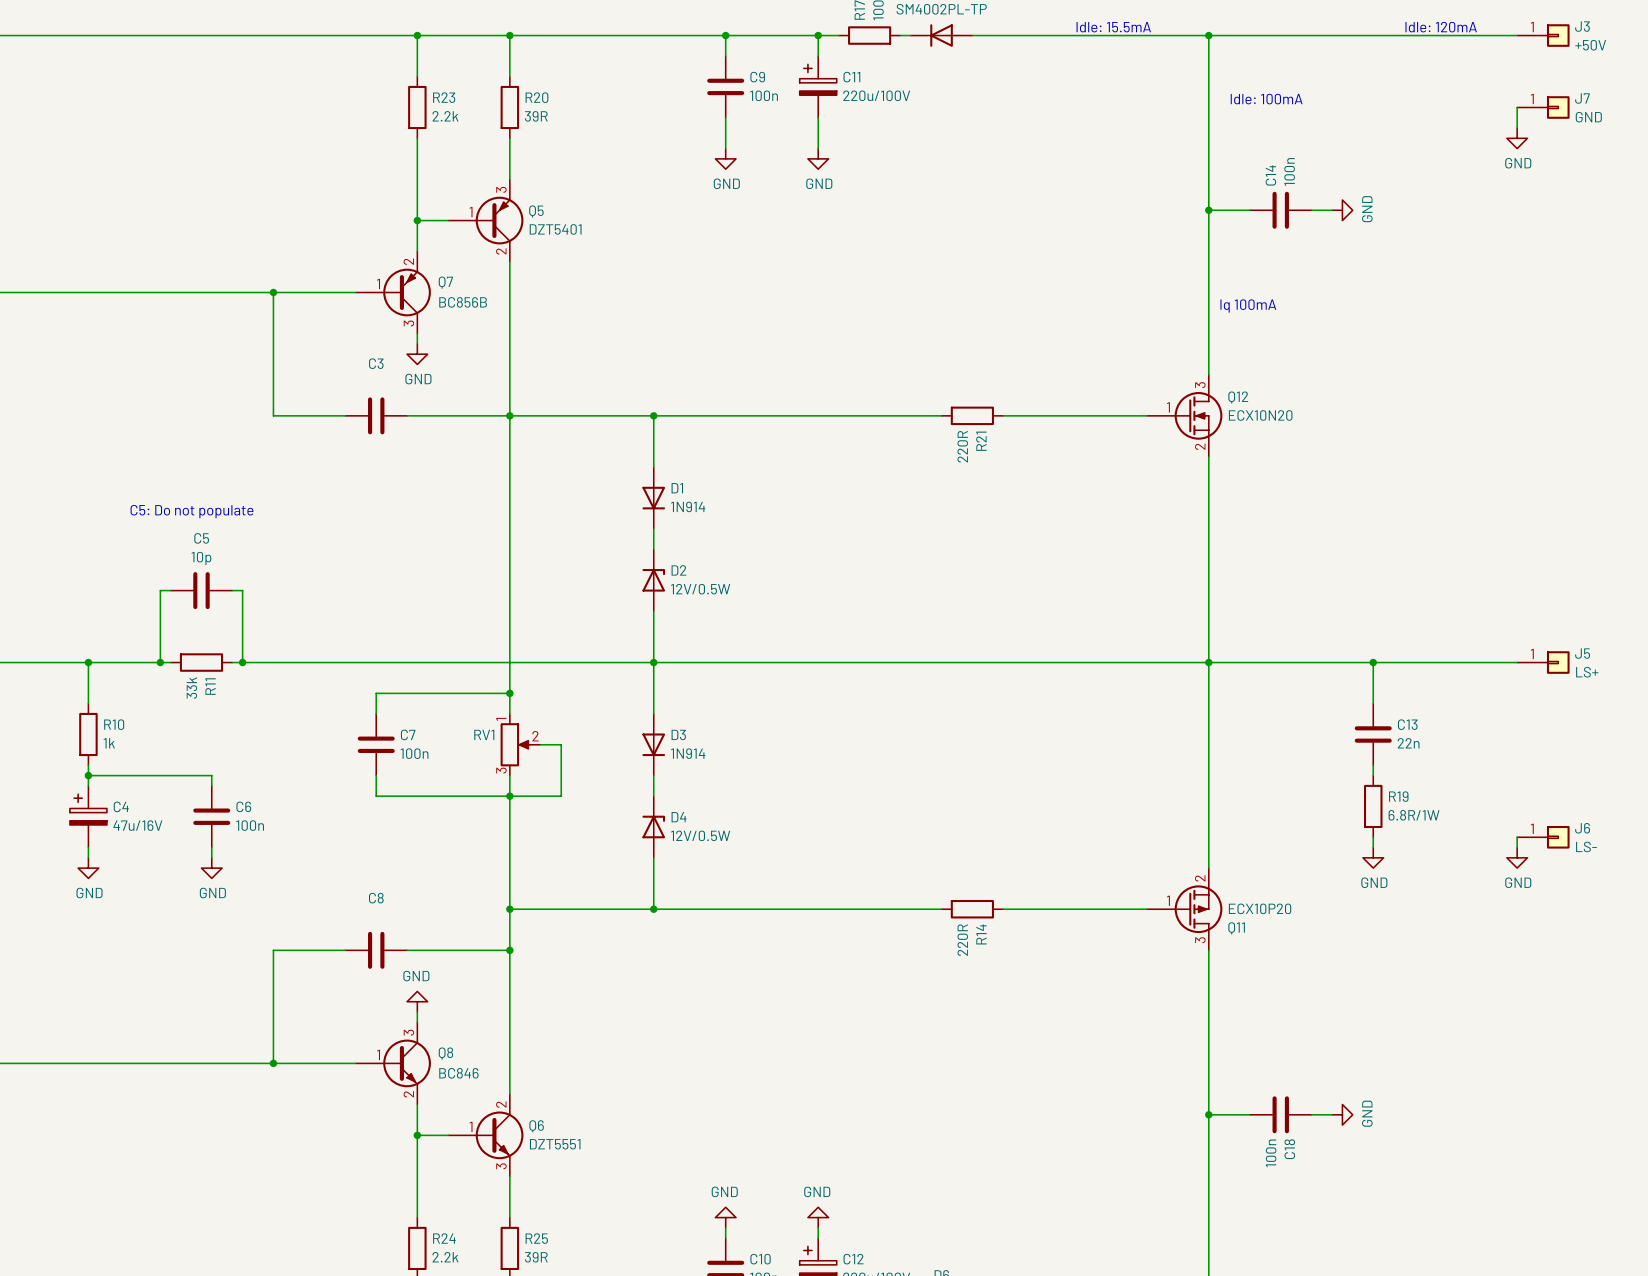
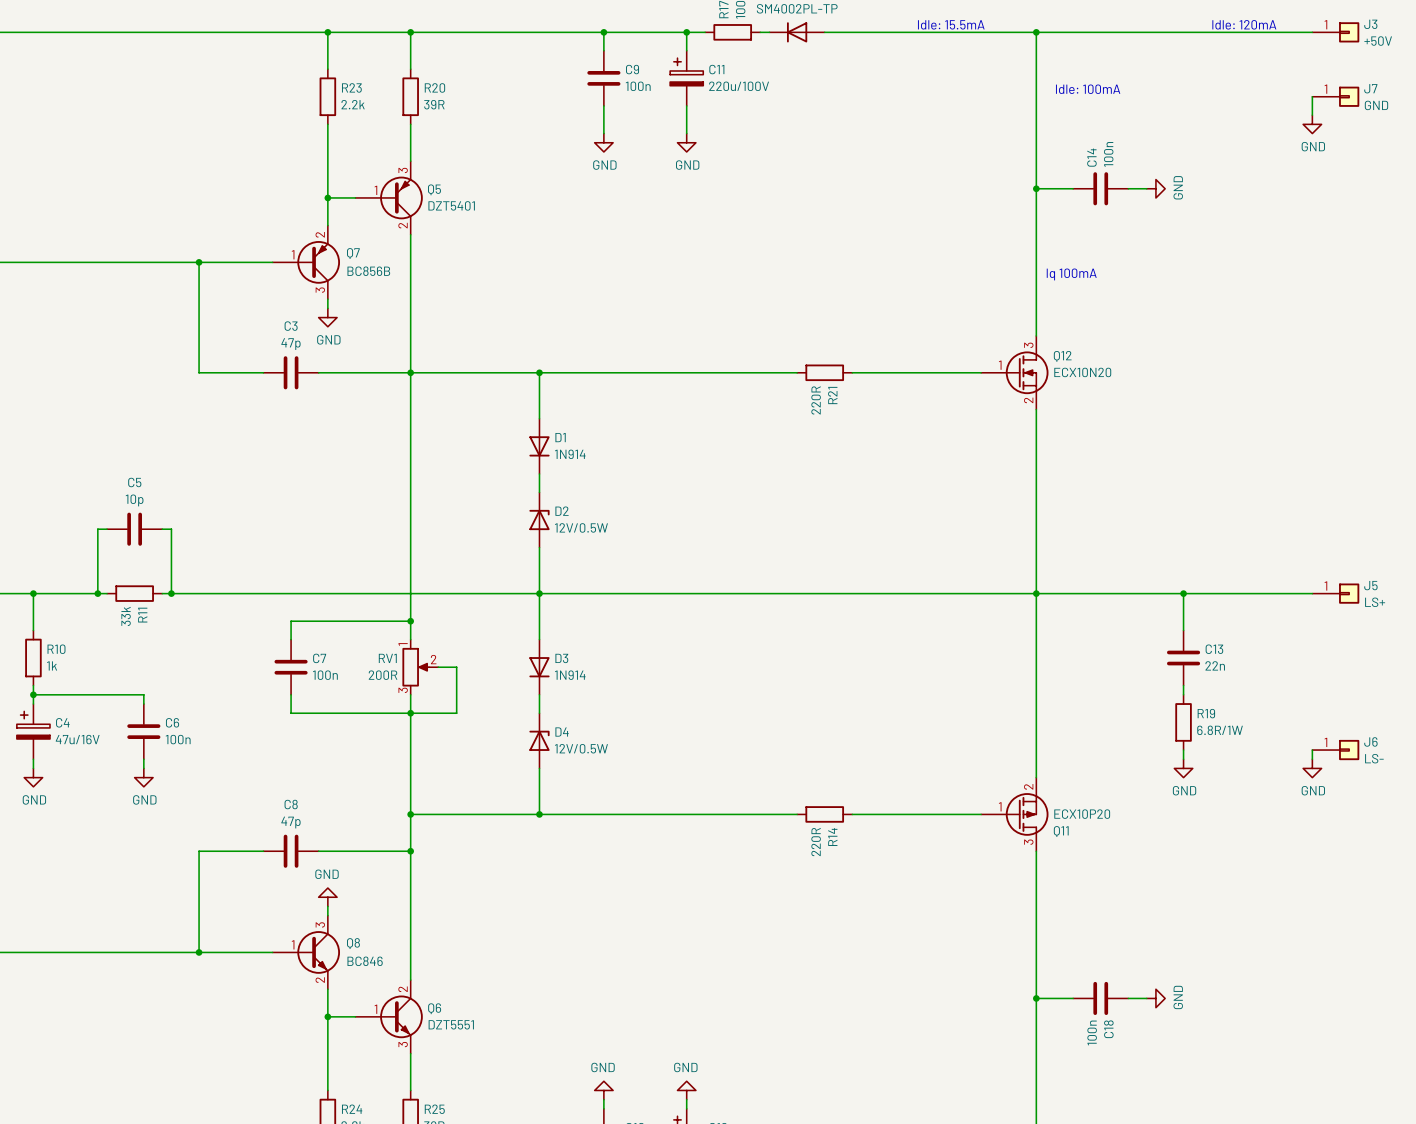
C3 value: none -> 47p (290, 344)
text: C5: Do not populate (191, 511) -> none
RV1 value: none -> 200R (383, 675)
C8 value: none -> 47p (290, 822)

